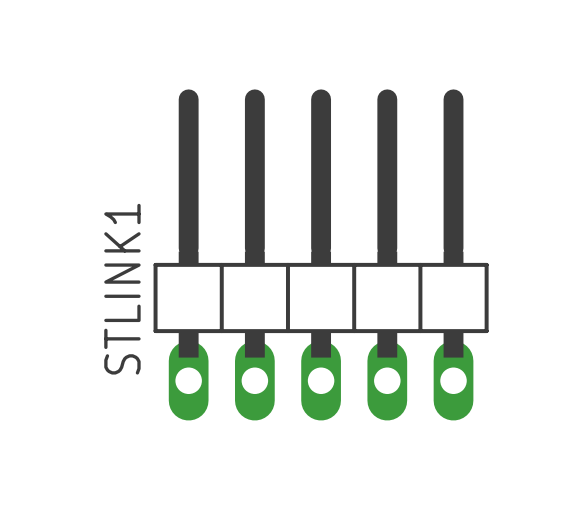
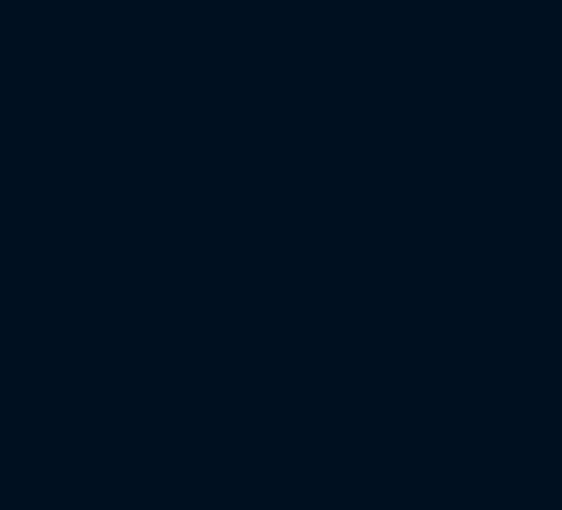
STLINK1: (321, 254) -> none

